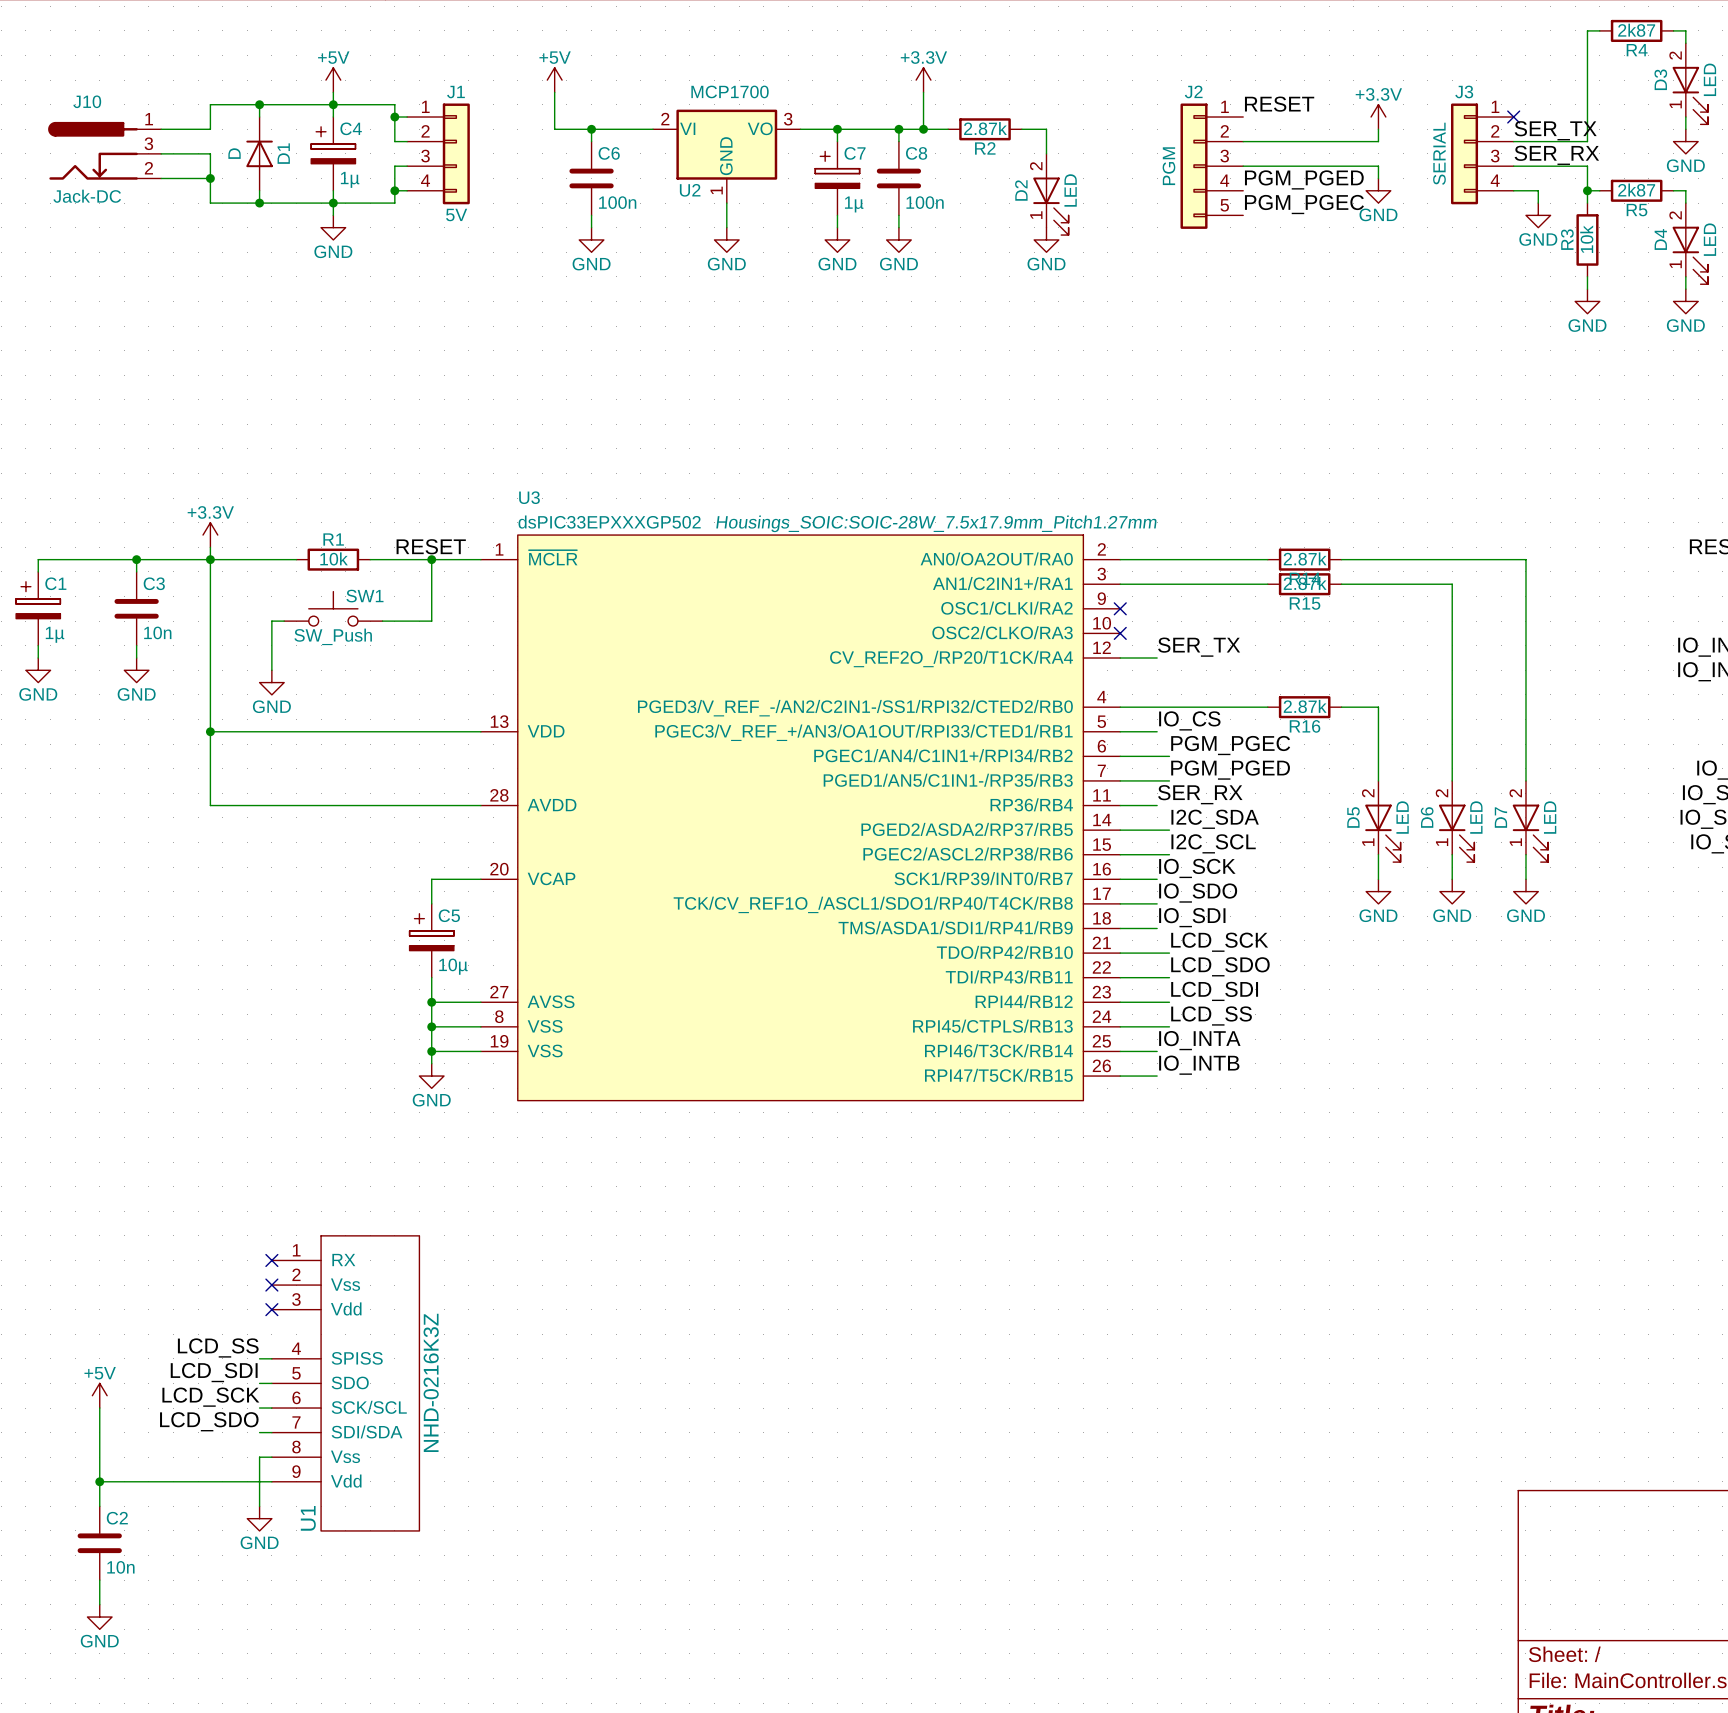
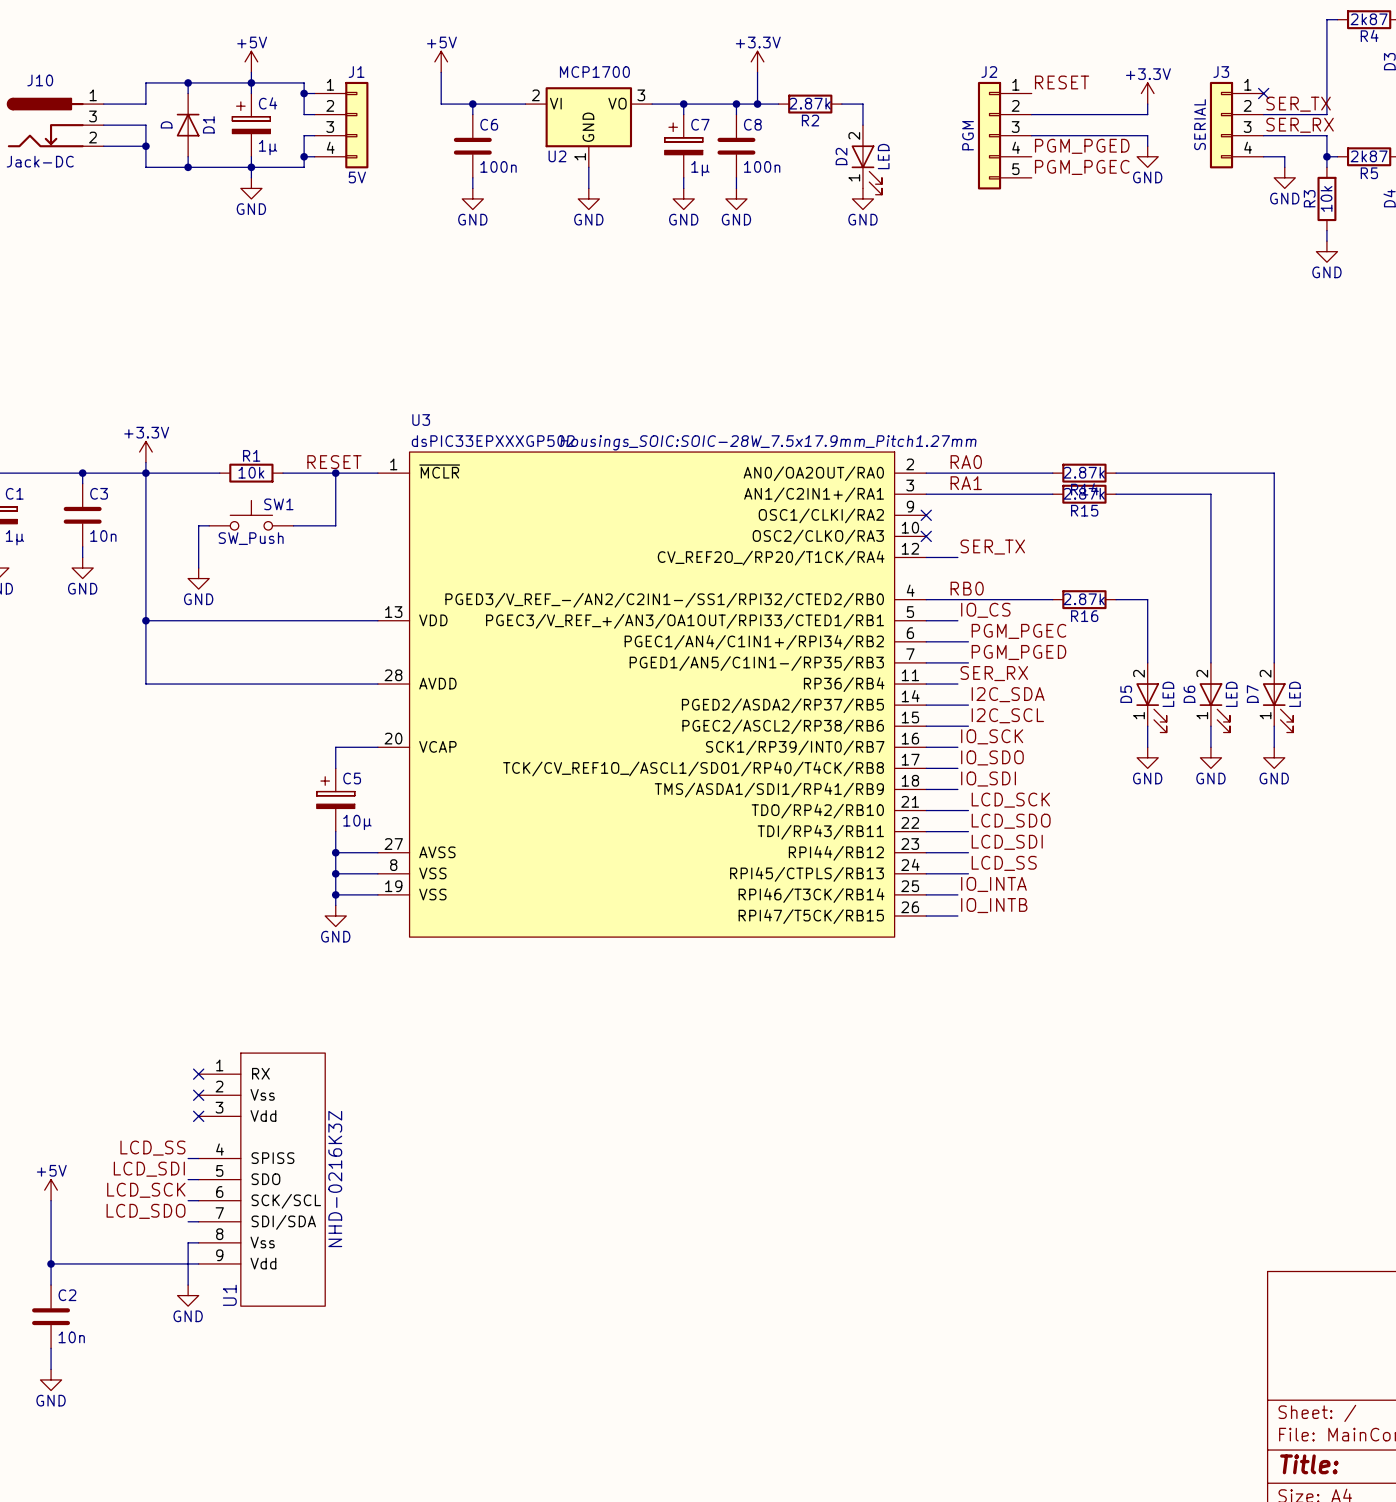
label: none -> RA0 (966, 462)
label: none -> RA1 (966, 483)
label: none -> RB0 (967, 588)

